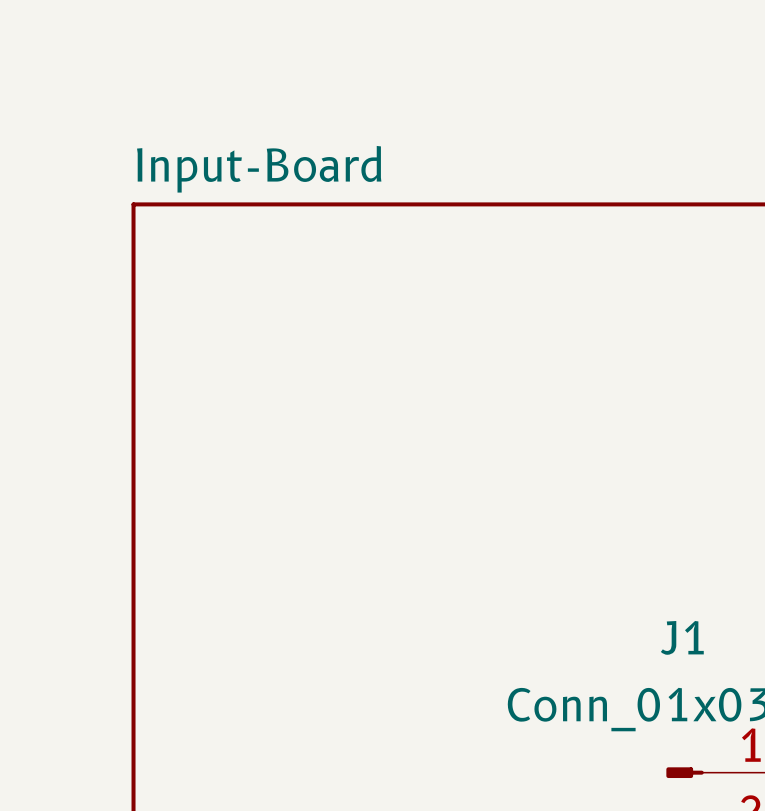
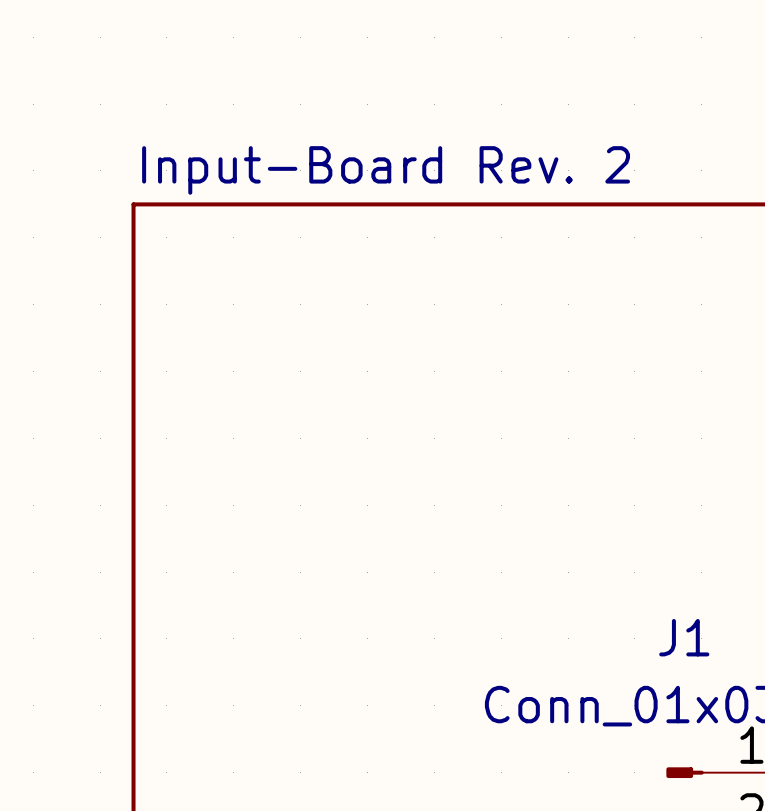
sheet Input-Board name: Input-Board (259, 169) -> Input-Board Rev. 2 (386, 170)

